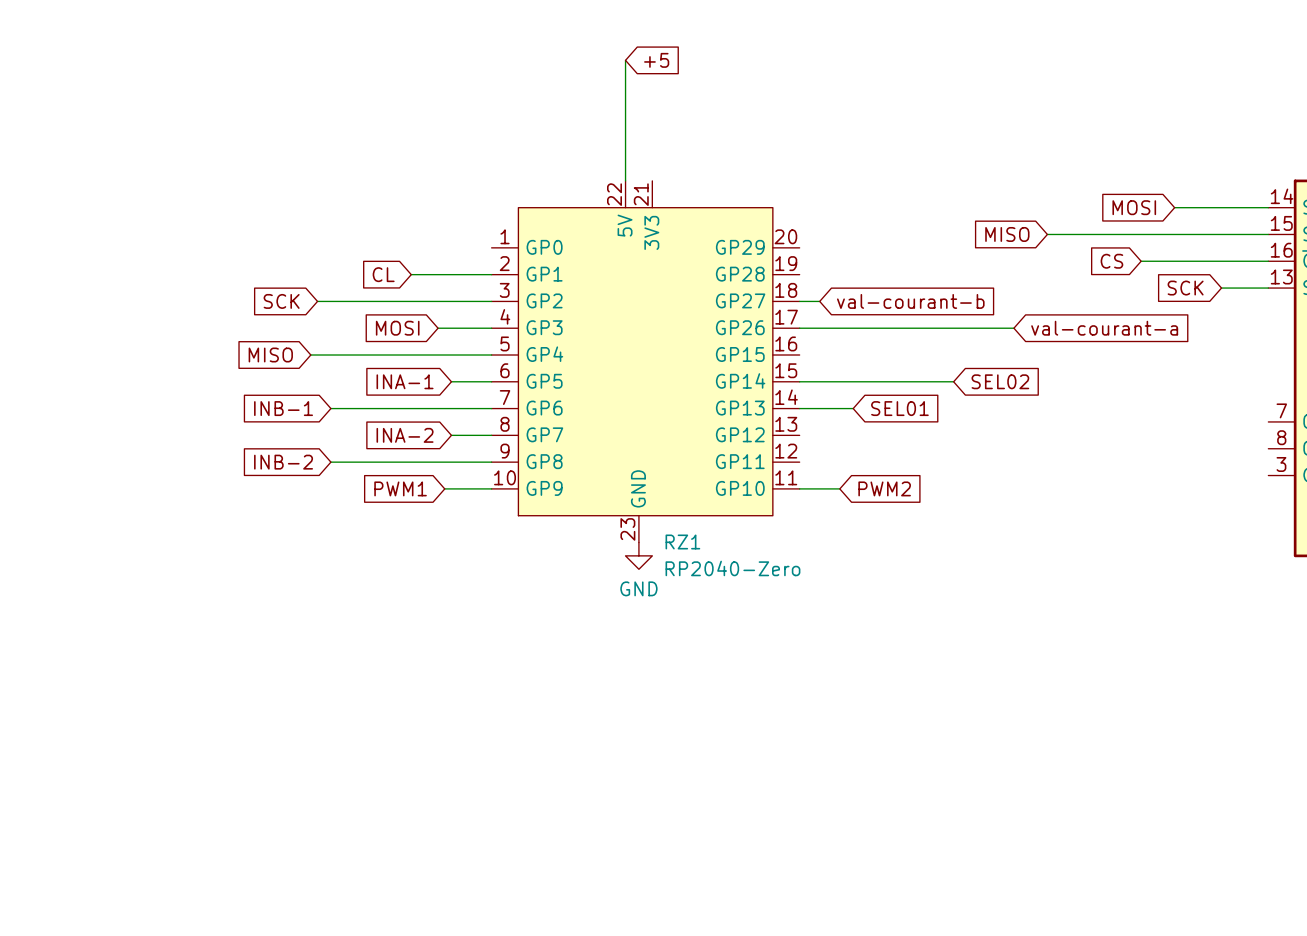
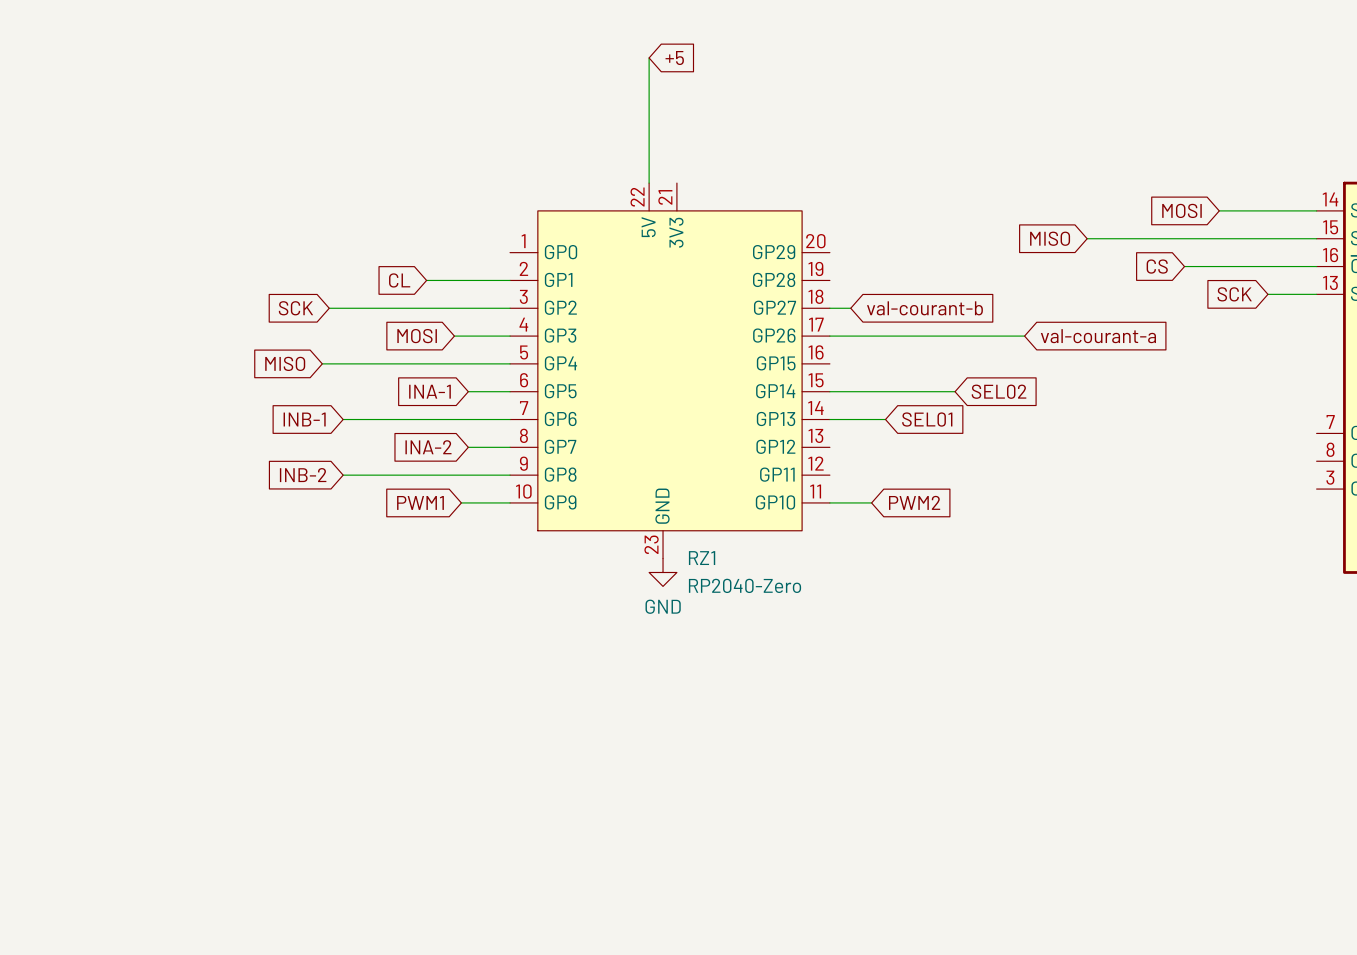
wire: (987, 328) (1013, 328) -> none
global label position: val-courant-a (1104, 328) -> val-courant-a (1098, 336)
wire: (920, 381) (953, 381) -> none
global label position: SEL02 (1000, 381) -> SEL02 (999, 391)

